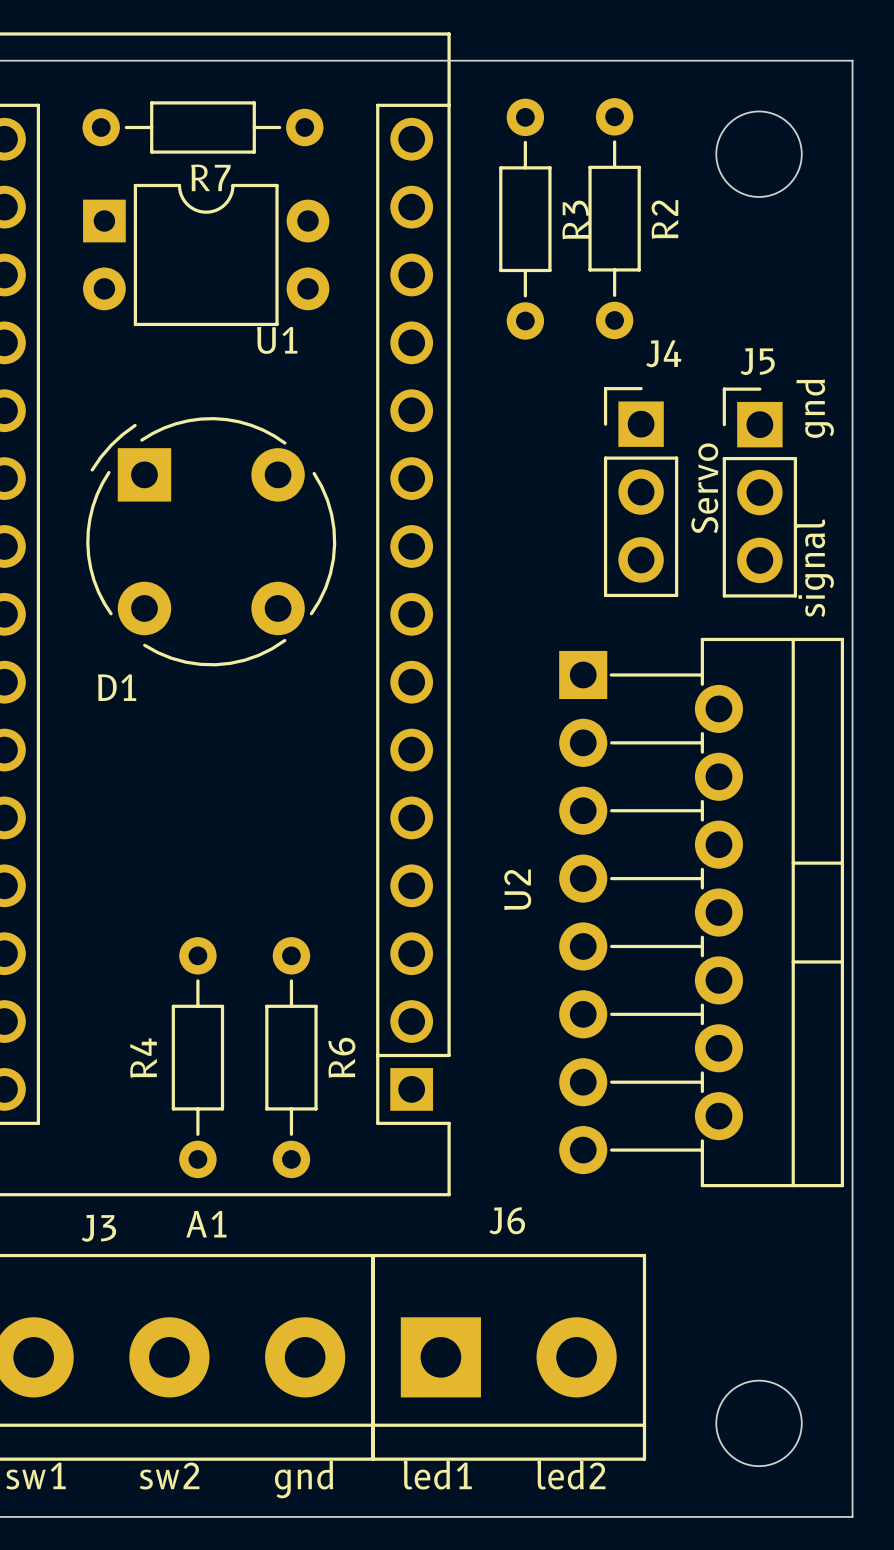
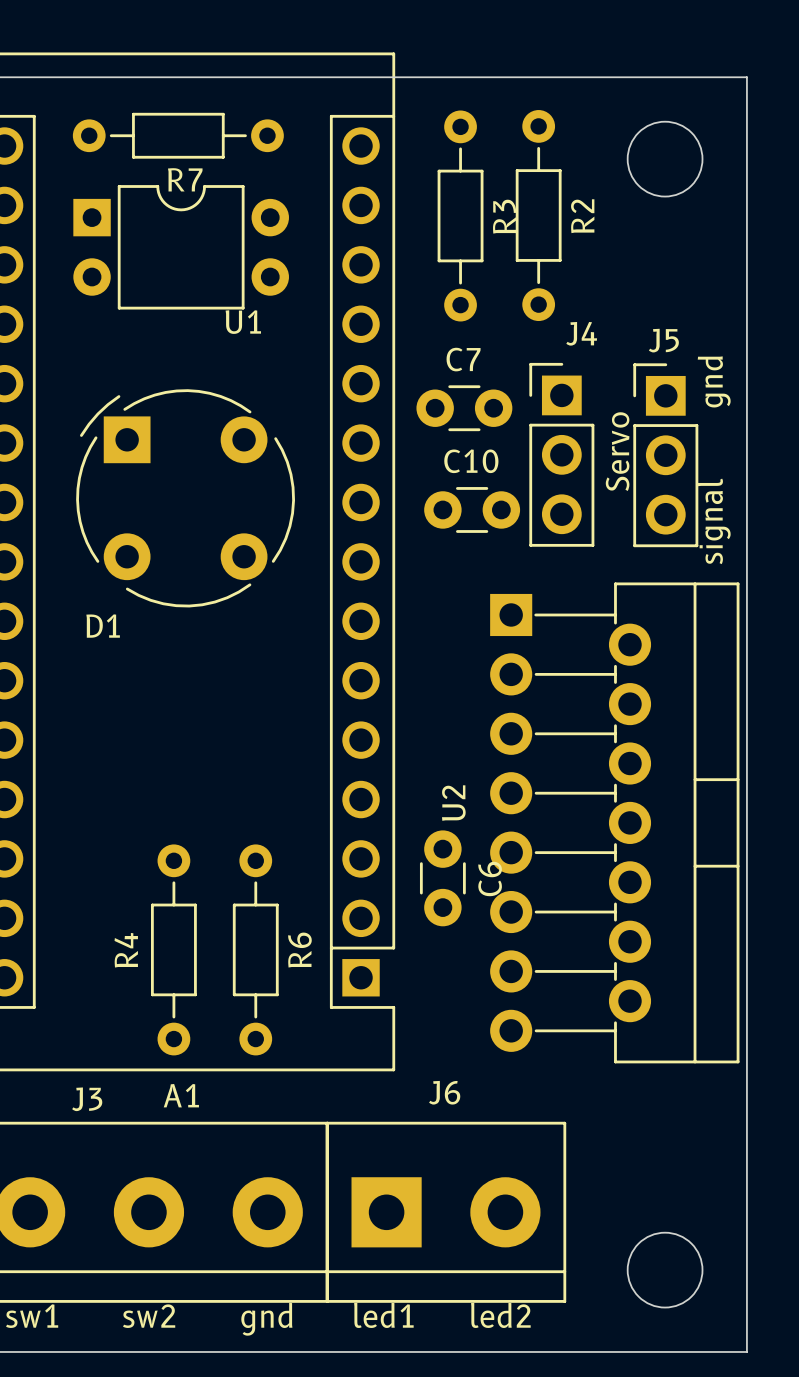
C7: none -> (464, 408)
C10: none -> (472, 509)
C6: none -> (442, 878)

